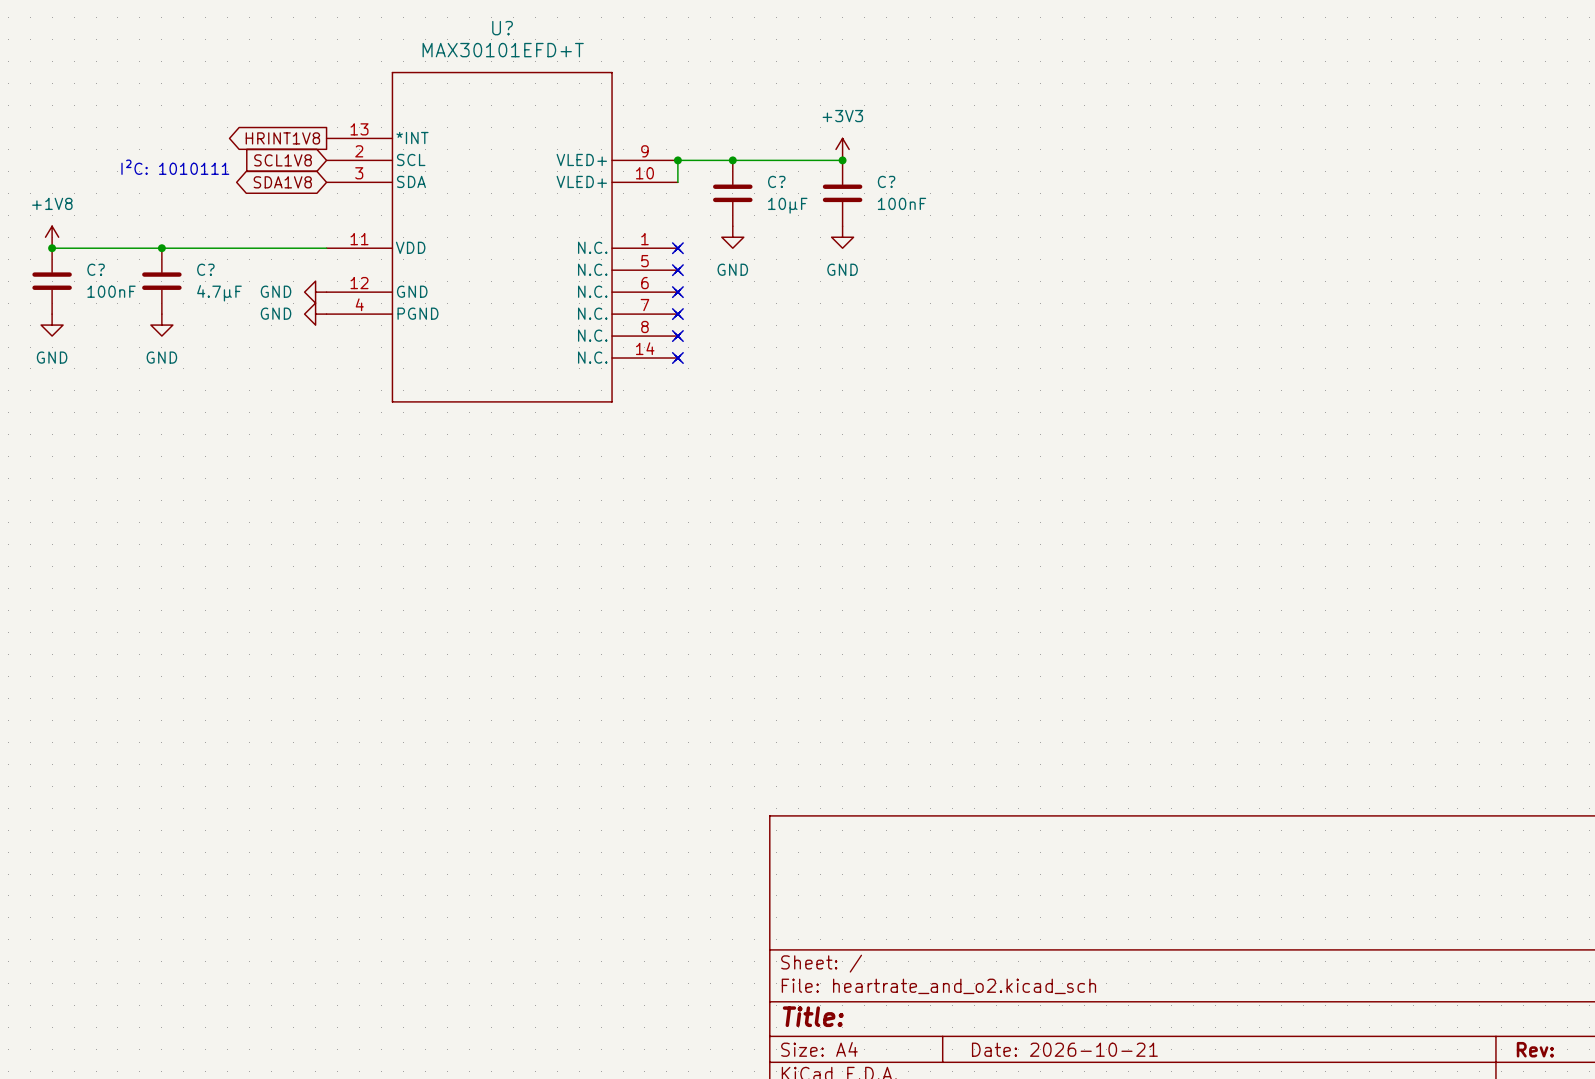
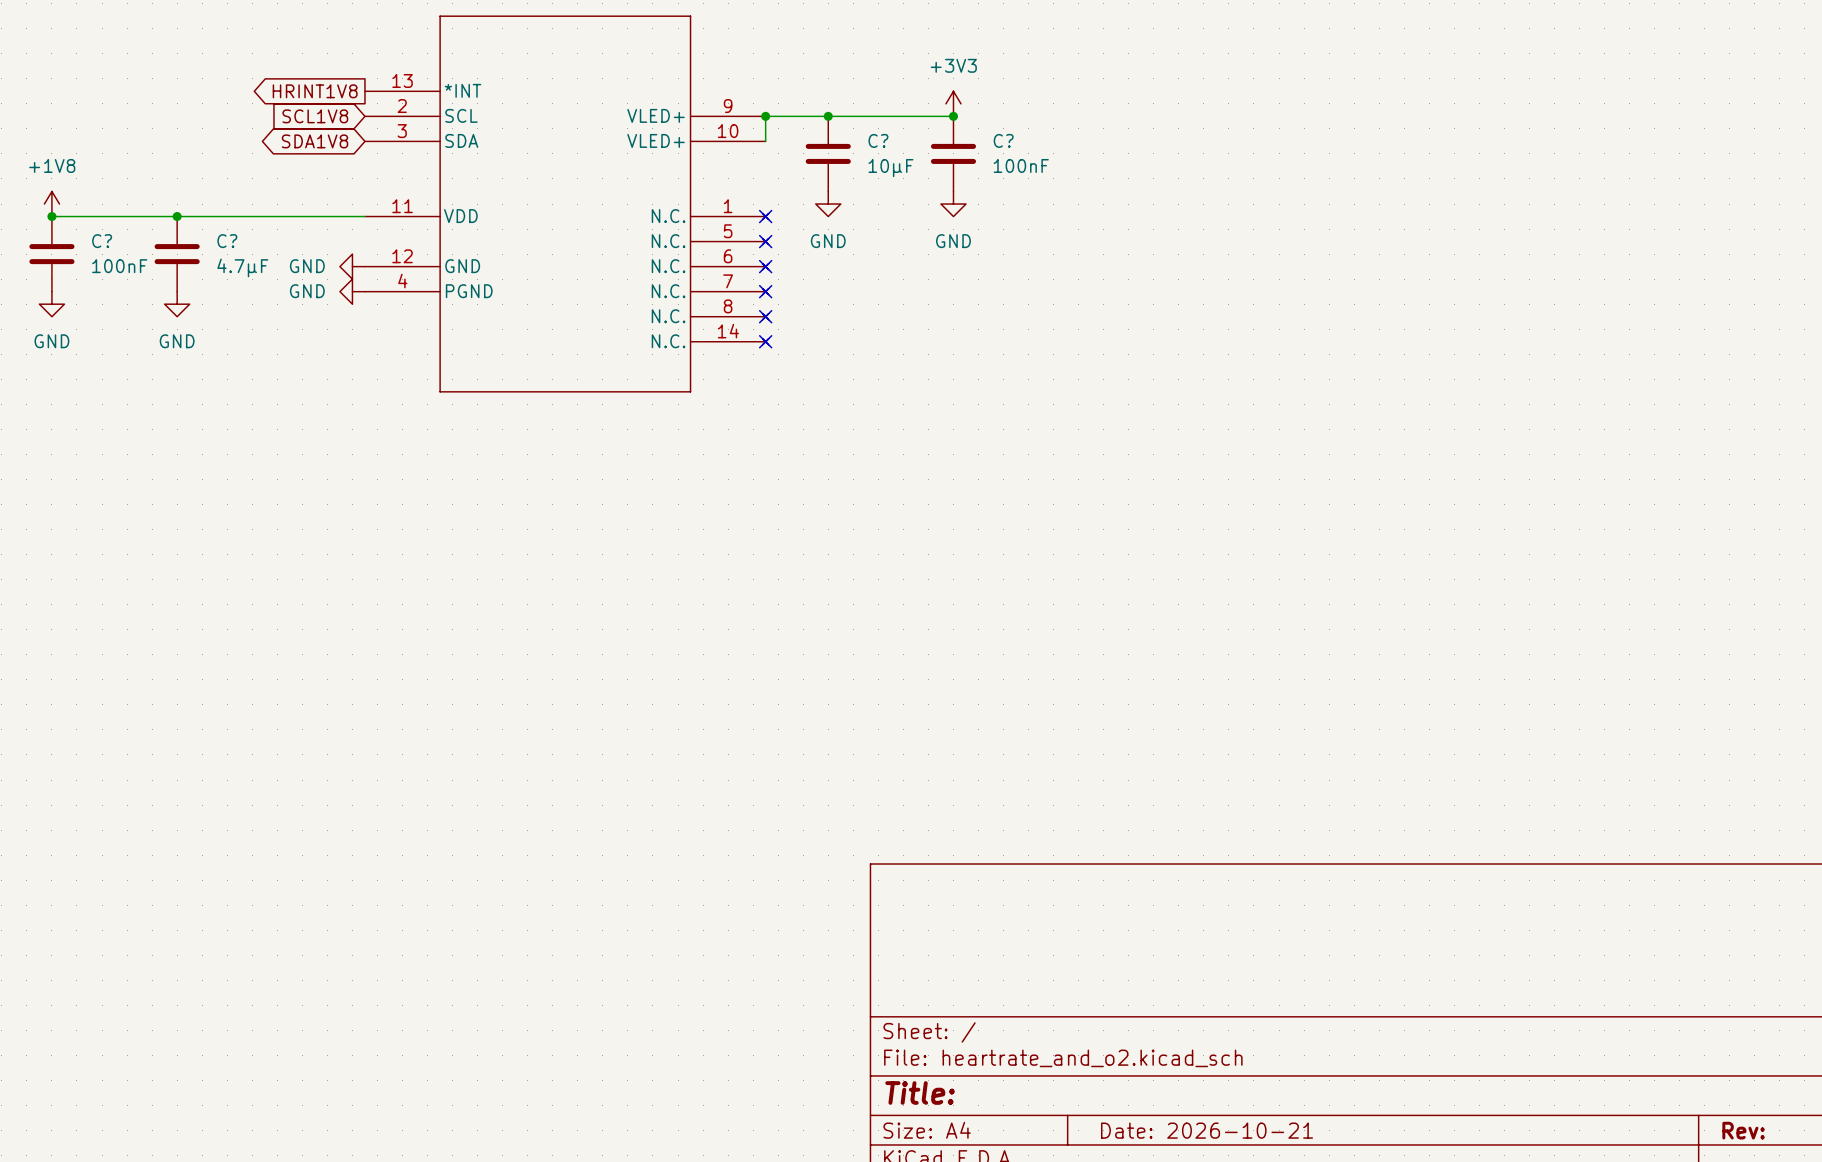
text: I²C: 1010111 (175, 167) -> none

